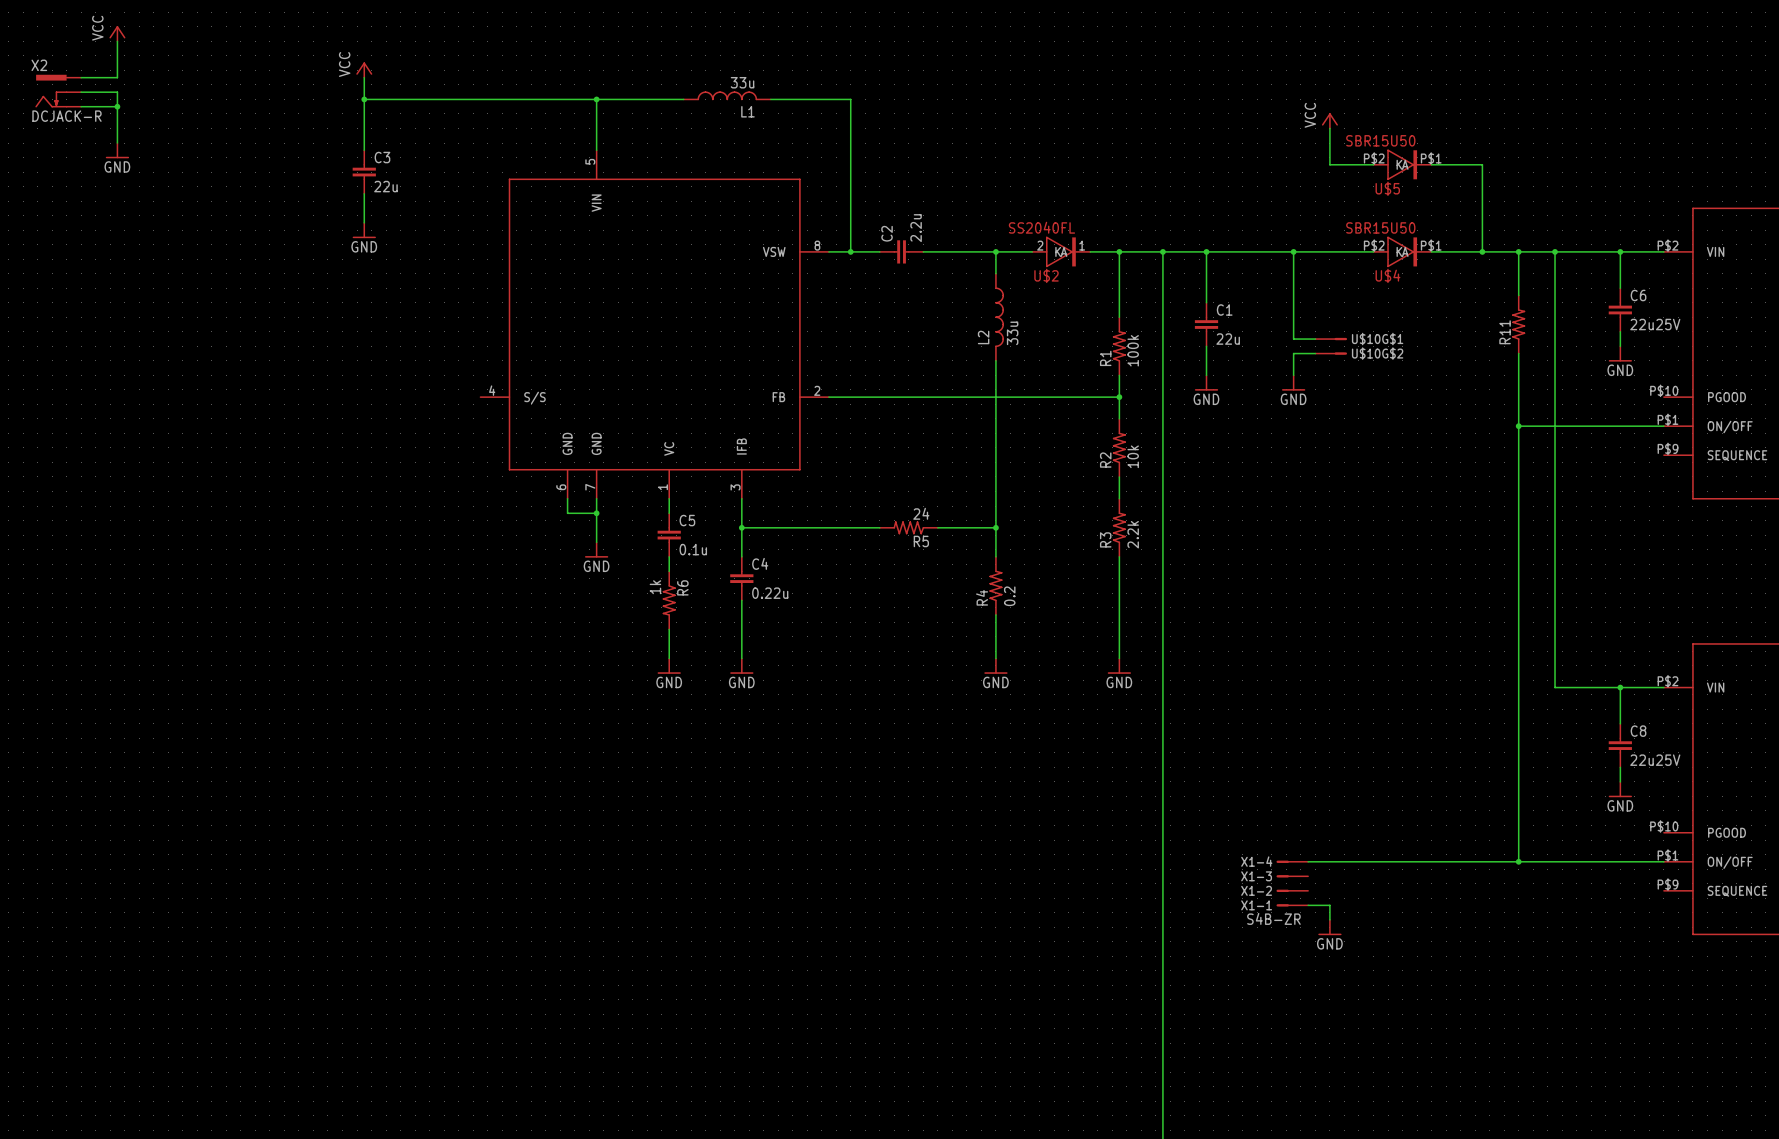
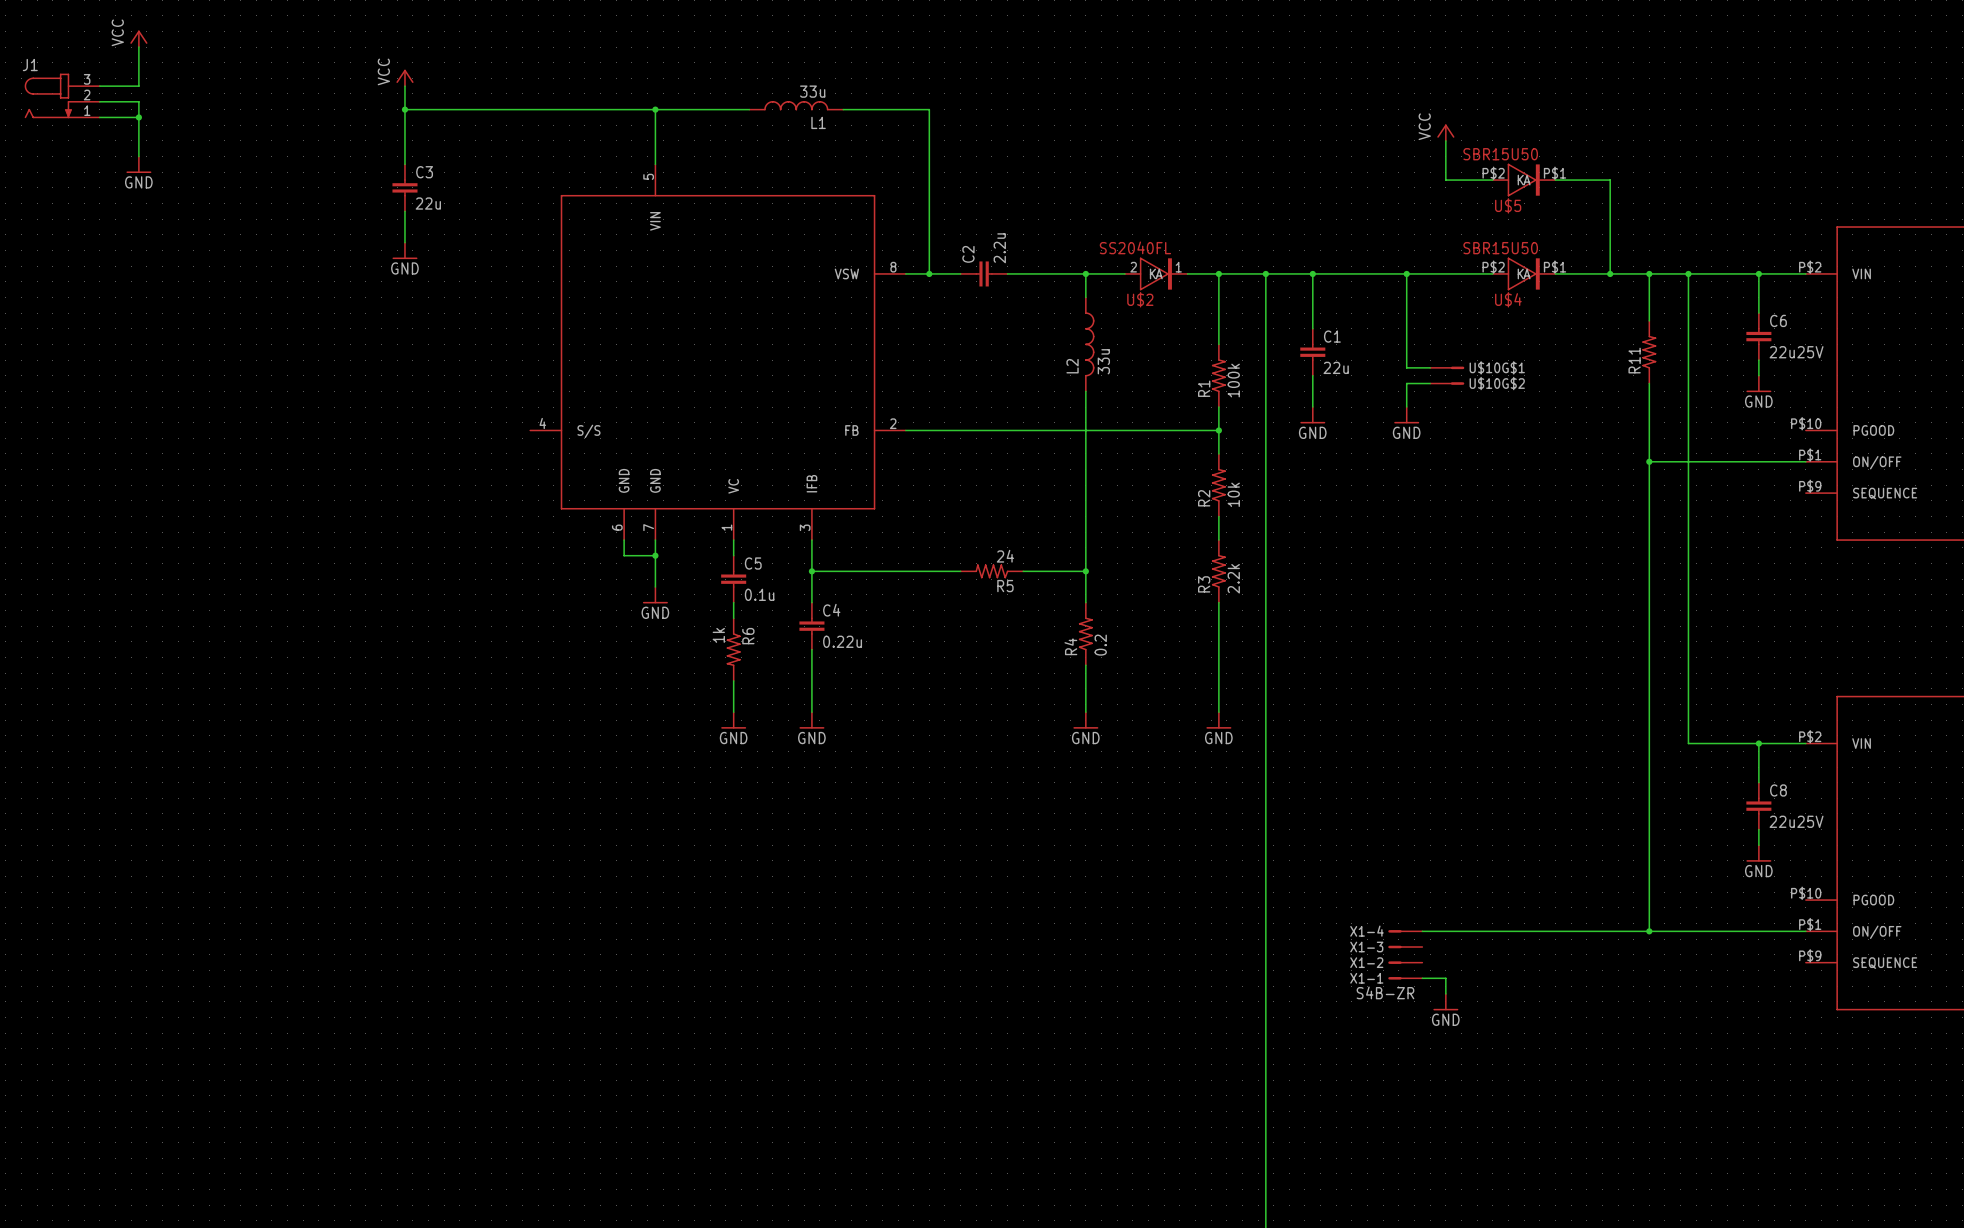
J1: none -> (62, 95)
X2: DCJACK-R (58, 90) -> none

